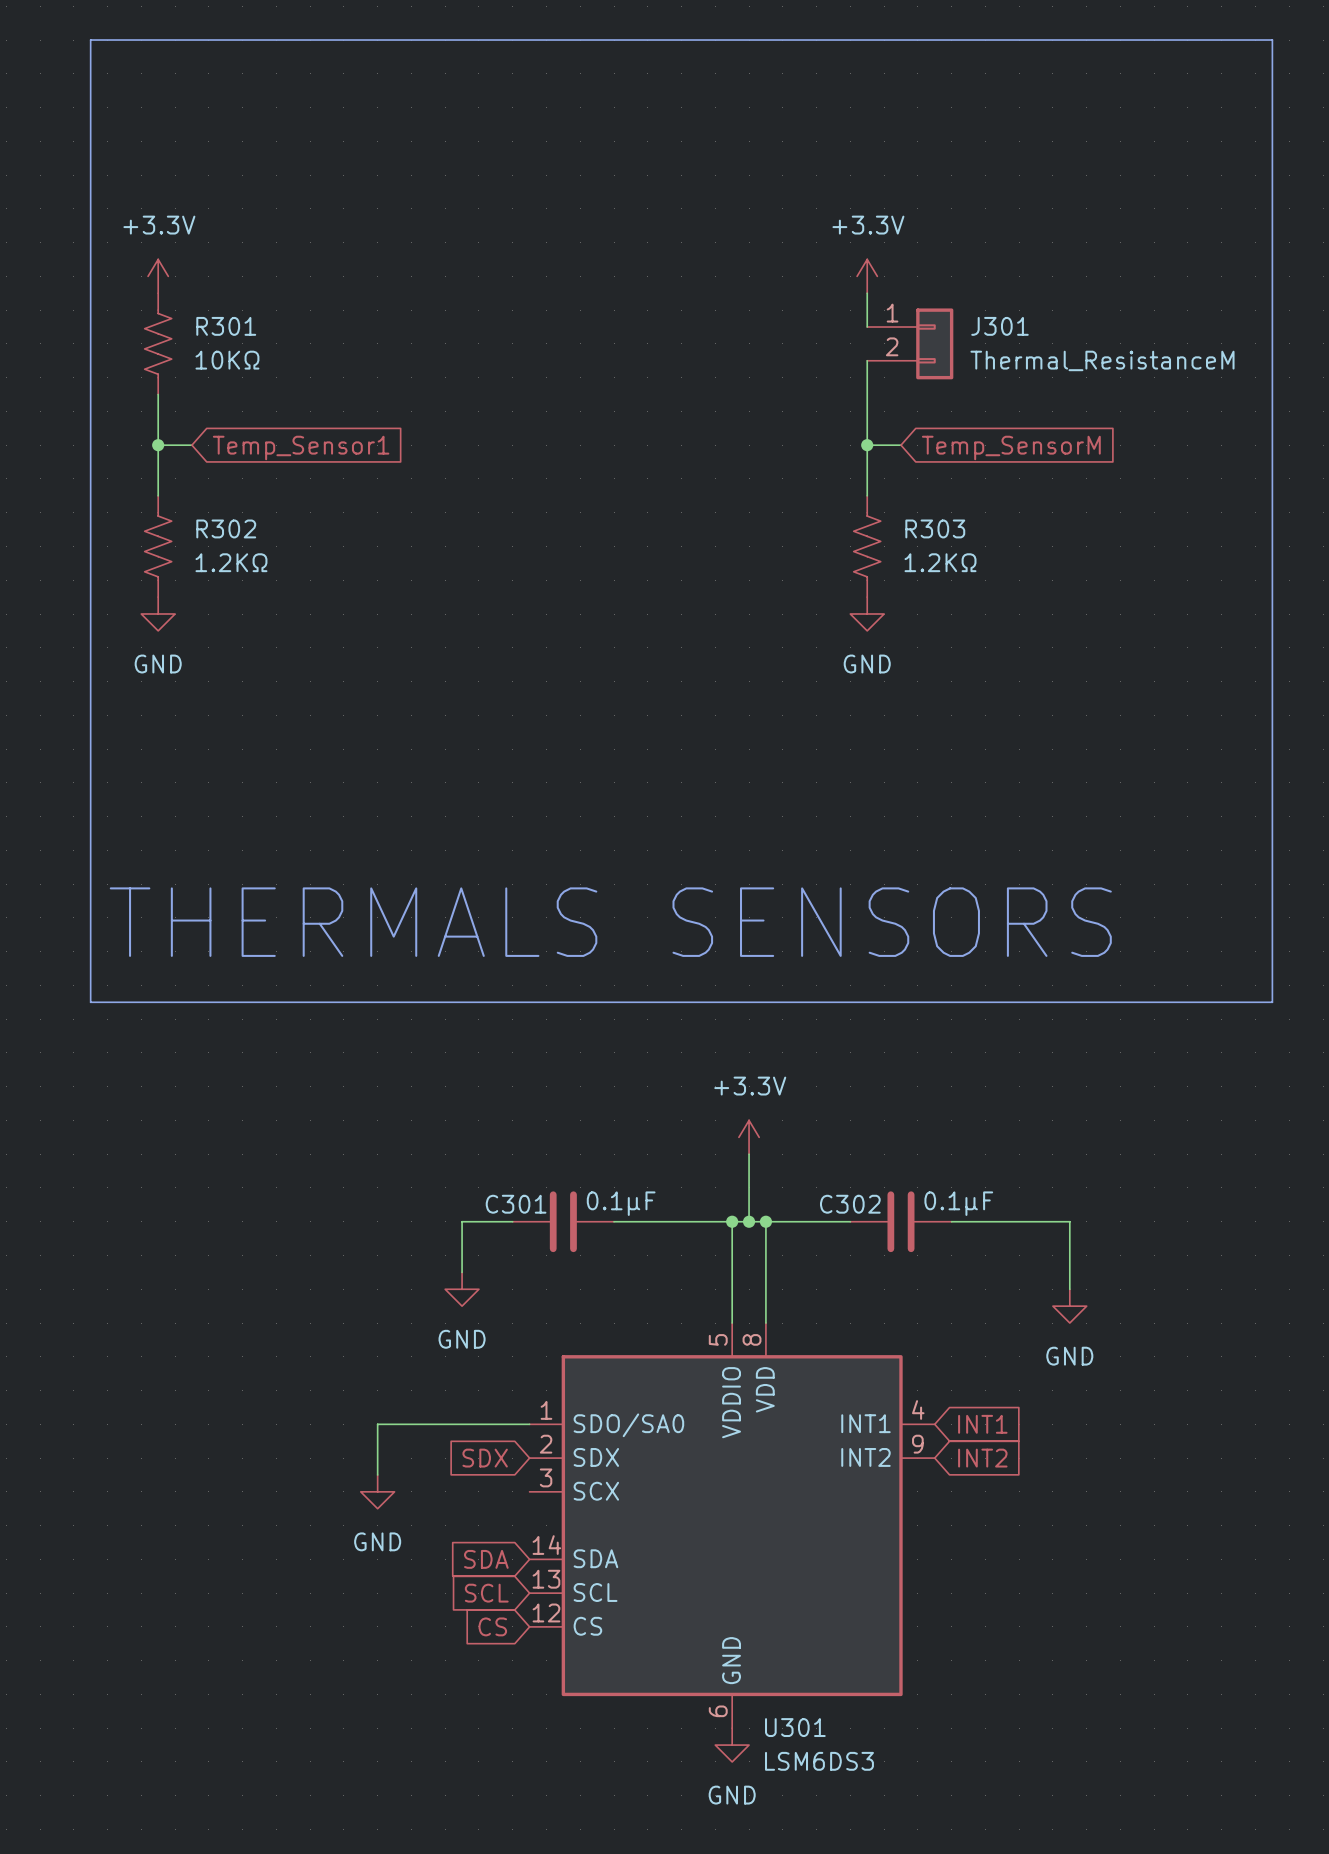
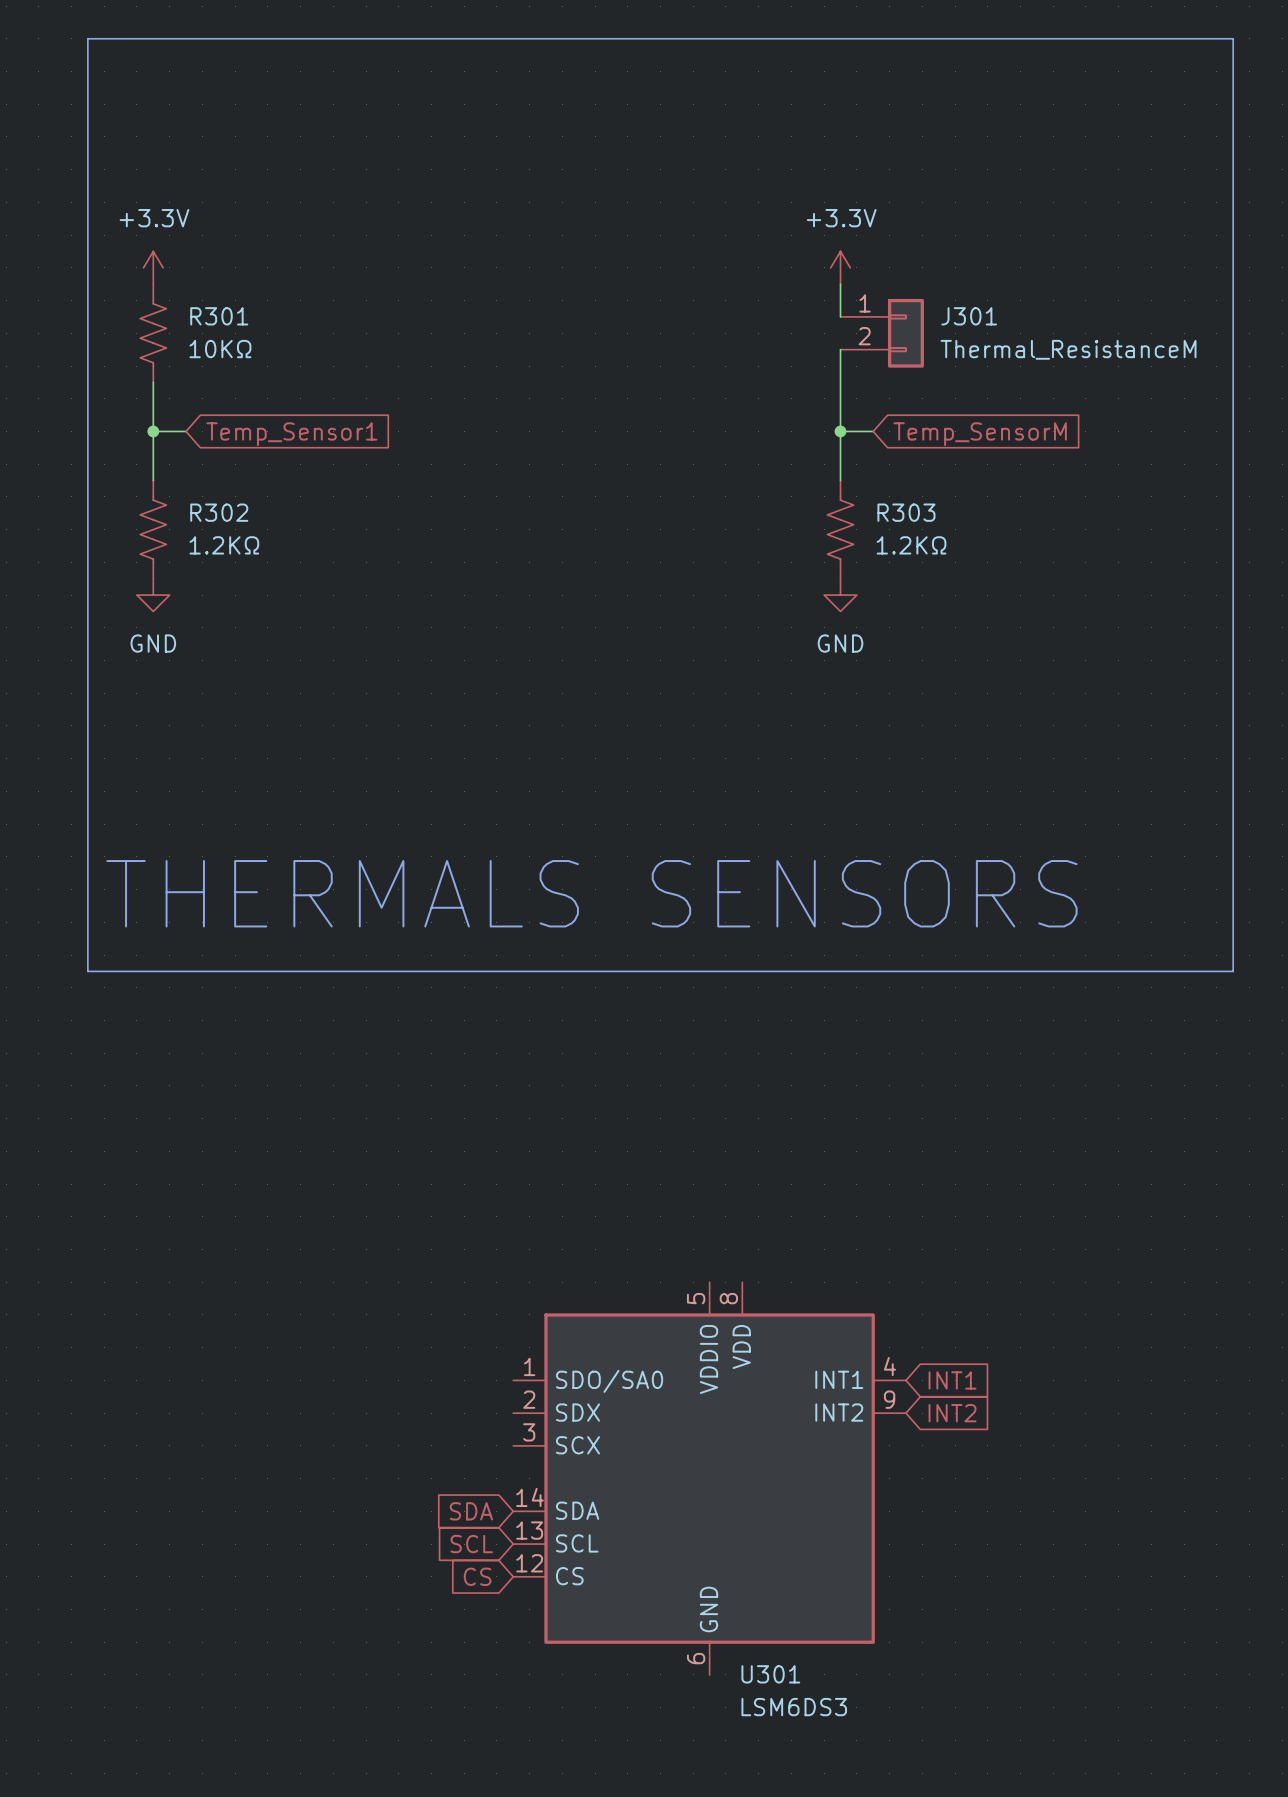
power symbol: +3.3V (749, 1137) -> none
wire: (749, 1154) (749, 1221) -> none
wire: (512, 1221) (462, 1221) (462, 1272) -> none
C301: 0.1μF (563, 1221) -> none
wire: (614, 1221) (850, 1221) -> none
wire: (732, 1221) (732, 1323) -> none
junction: (732, 1221) -> none
junction: (749, 1221) -> none
wire: (765, 1221) (765, 1323) -> none
junction: (765, 1221) -> none
C302: 0.1μF (900, 1221) -> none
wire: (951, 1221) (1069, 1221) (1069, 1289) -> none
power symbol: GND (462, 1289) -> none
power symbol: GND (1069, 1306) -> none
wire: (529, 1424) (377, 1424) (377, 1474) -> none
global label: SDX (485, 1458) -> none
power symbol: GND (377, 1491) -> none
power symbol: GND (732, 1745) -> none

